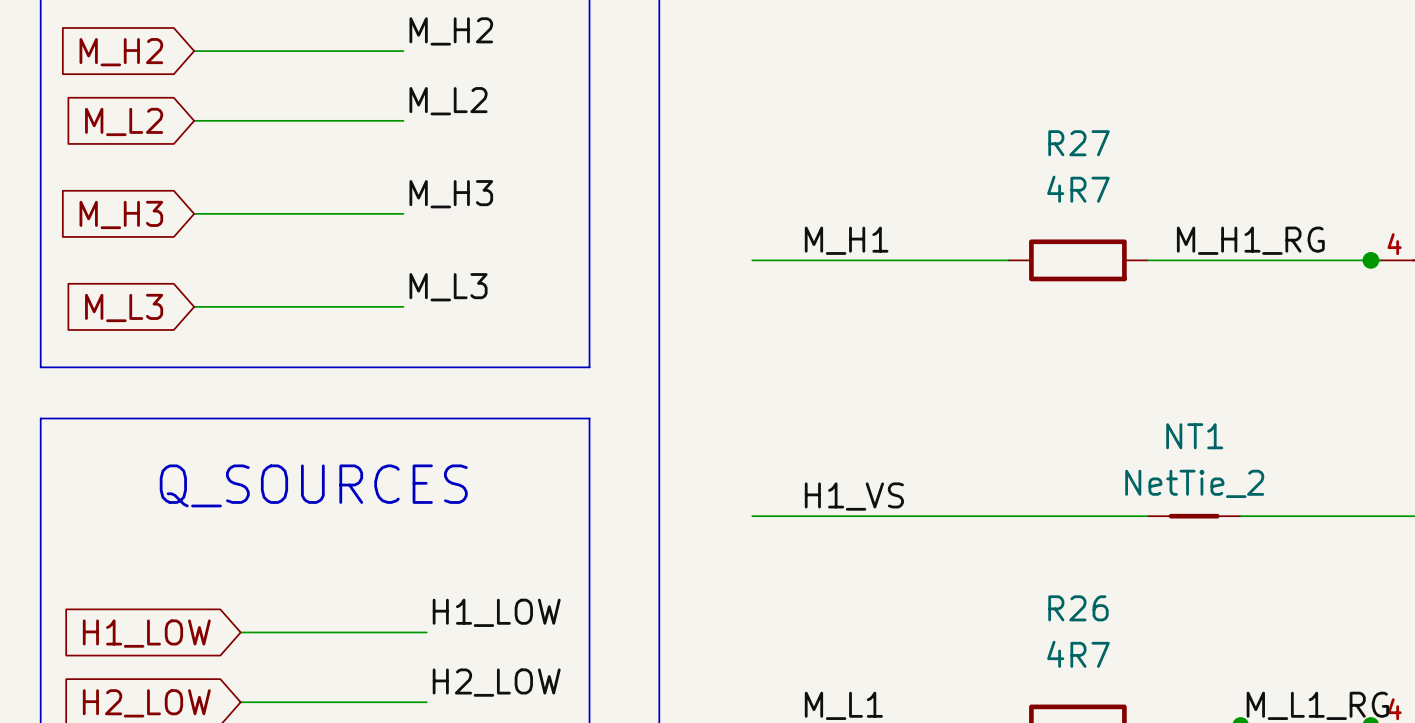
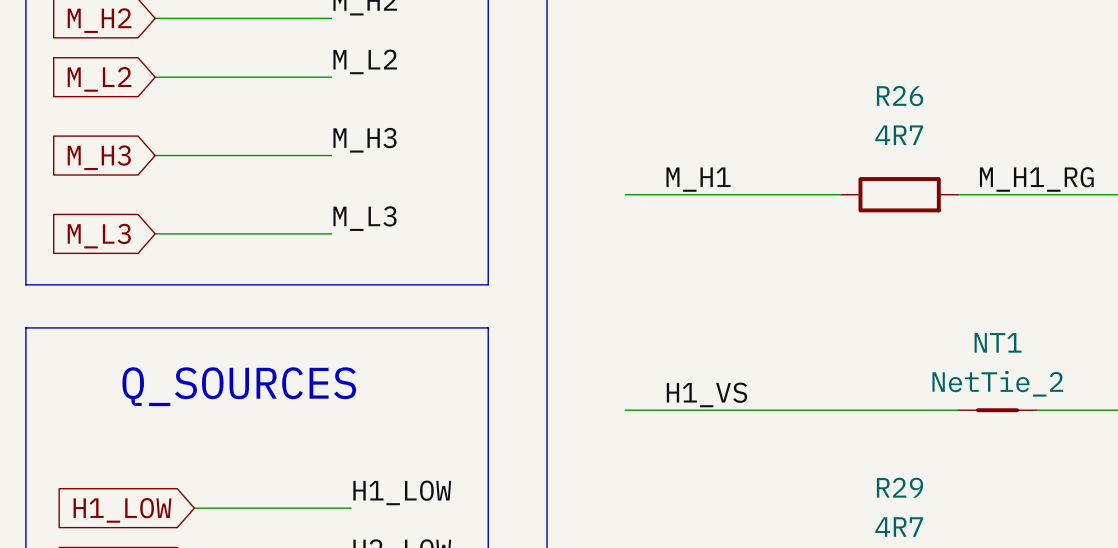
R27 name: R27 (1079, 143) -> R26 (900, 96)
R26 name: R26 (1078, 608) -> R29 (900, 487)

